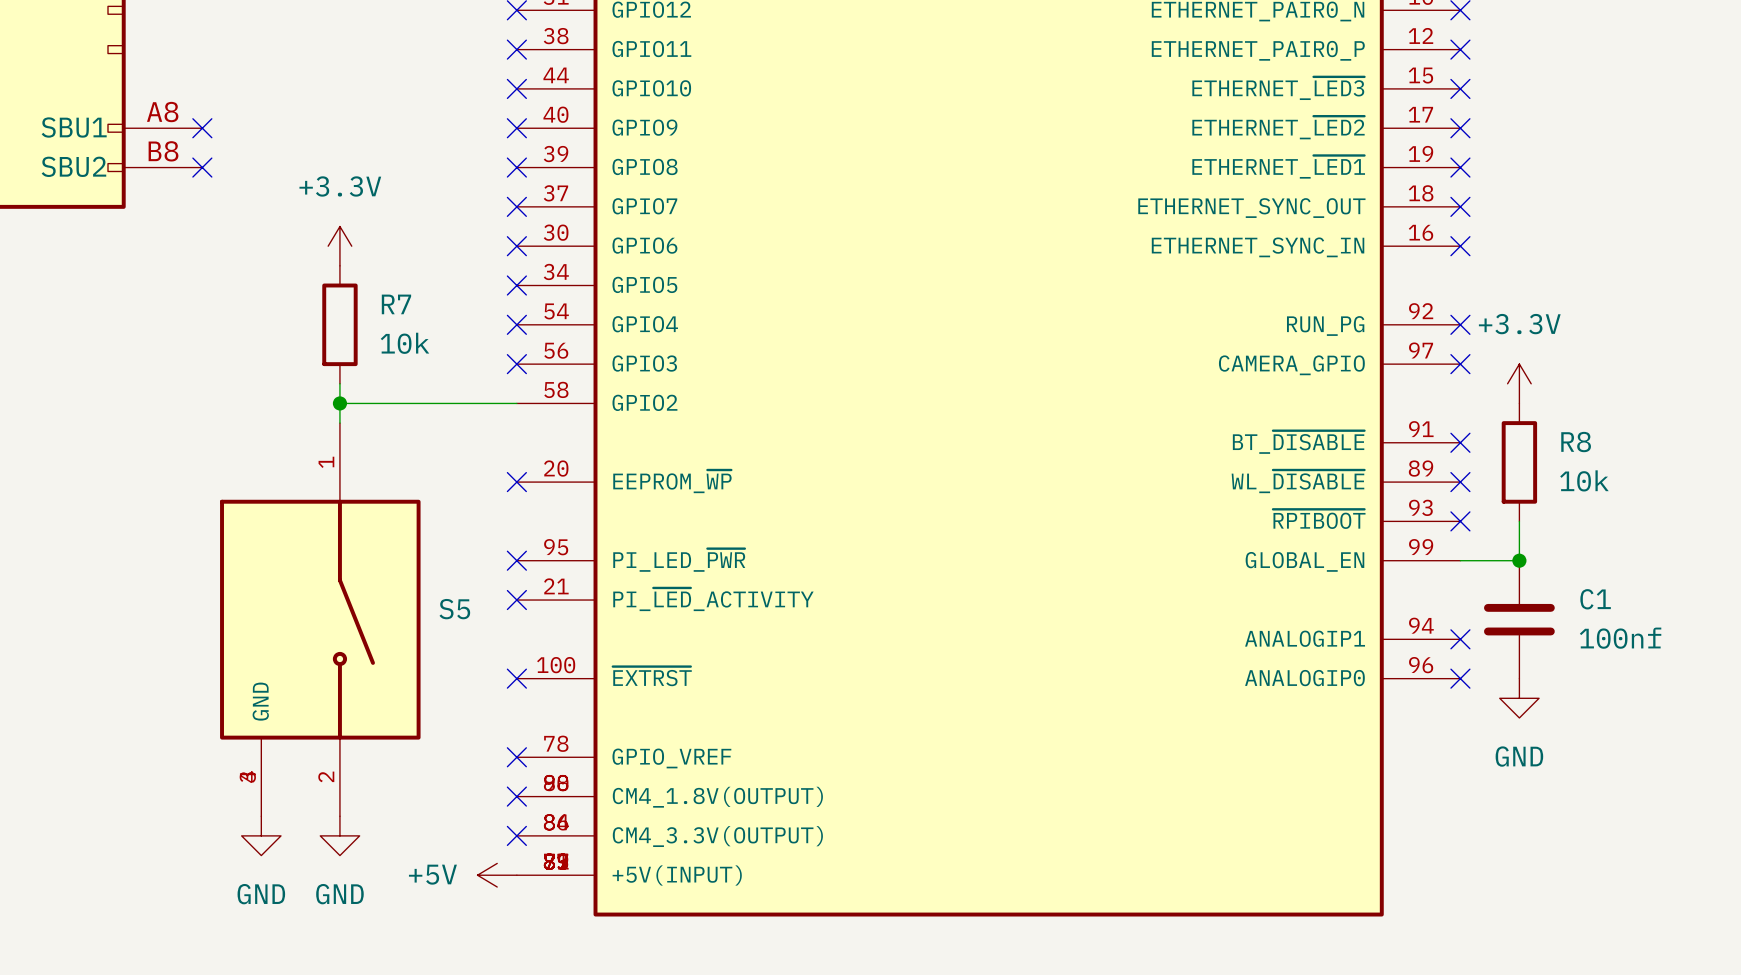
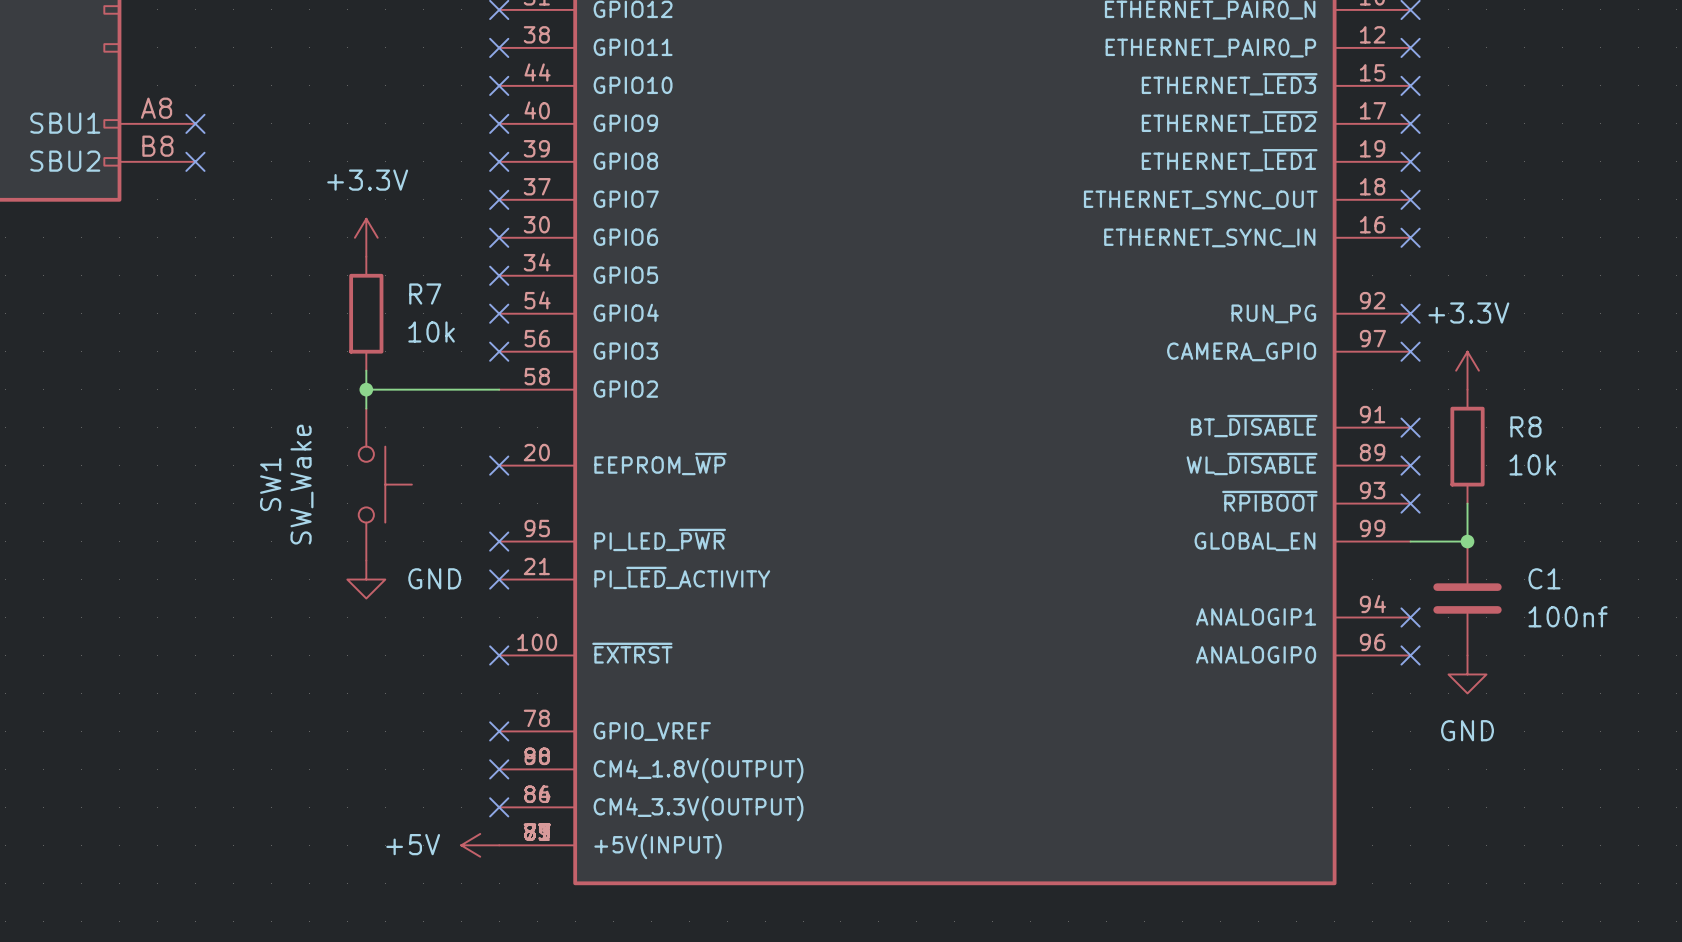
power symbol position: +3.3V (339, 246) -> +3.3V (366, 237)
R7 position: (339, 324) -> (366, 313)
wire: (339, 383) (339, 423) -> (366, 370) (366, 408)
wire: (339, 403) (379, 403) -> none
junction position: (339, 403) -> (366, 389)
SW1: none -> SW_Wake (385, 484)
power symbol: none -> GND (366, 579)
S5: (320, 619) -> none
power symbol: GND (261, 835) -> none
power symbol: GND (339, 835) -> none

